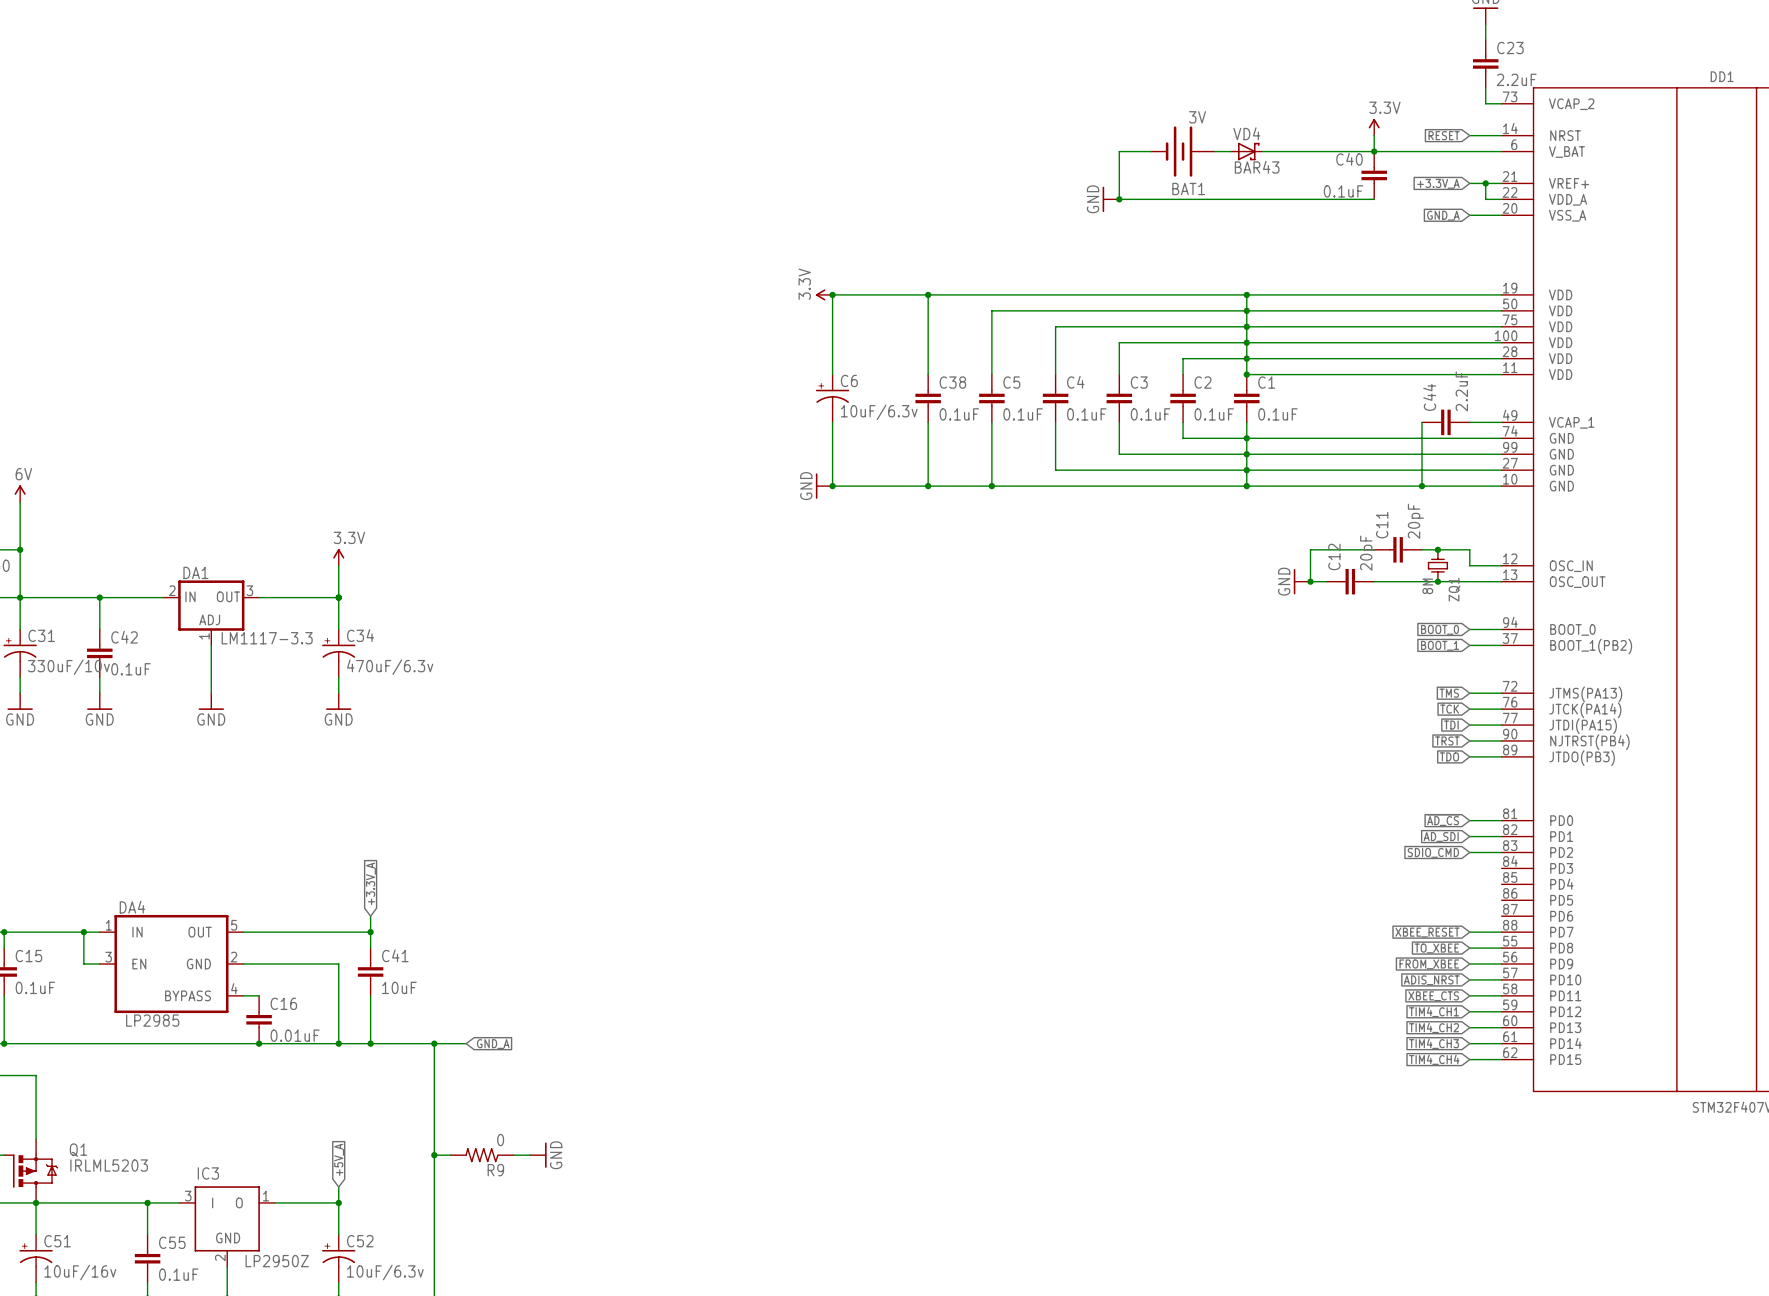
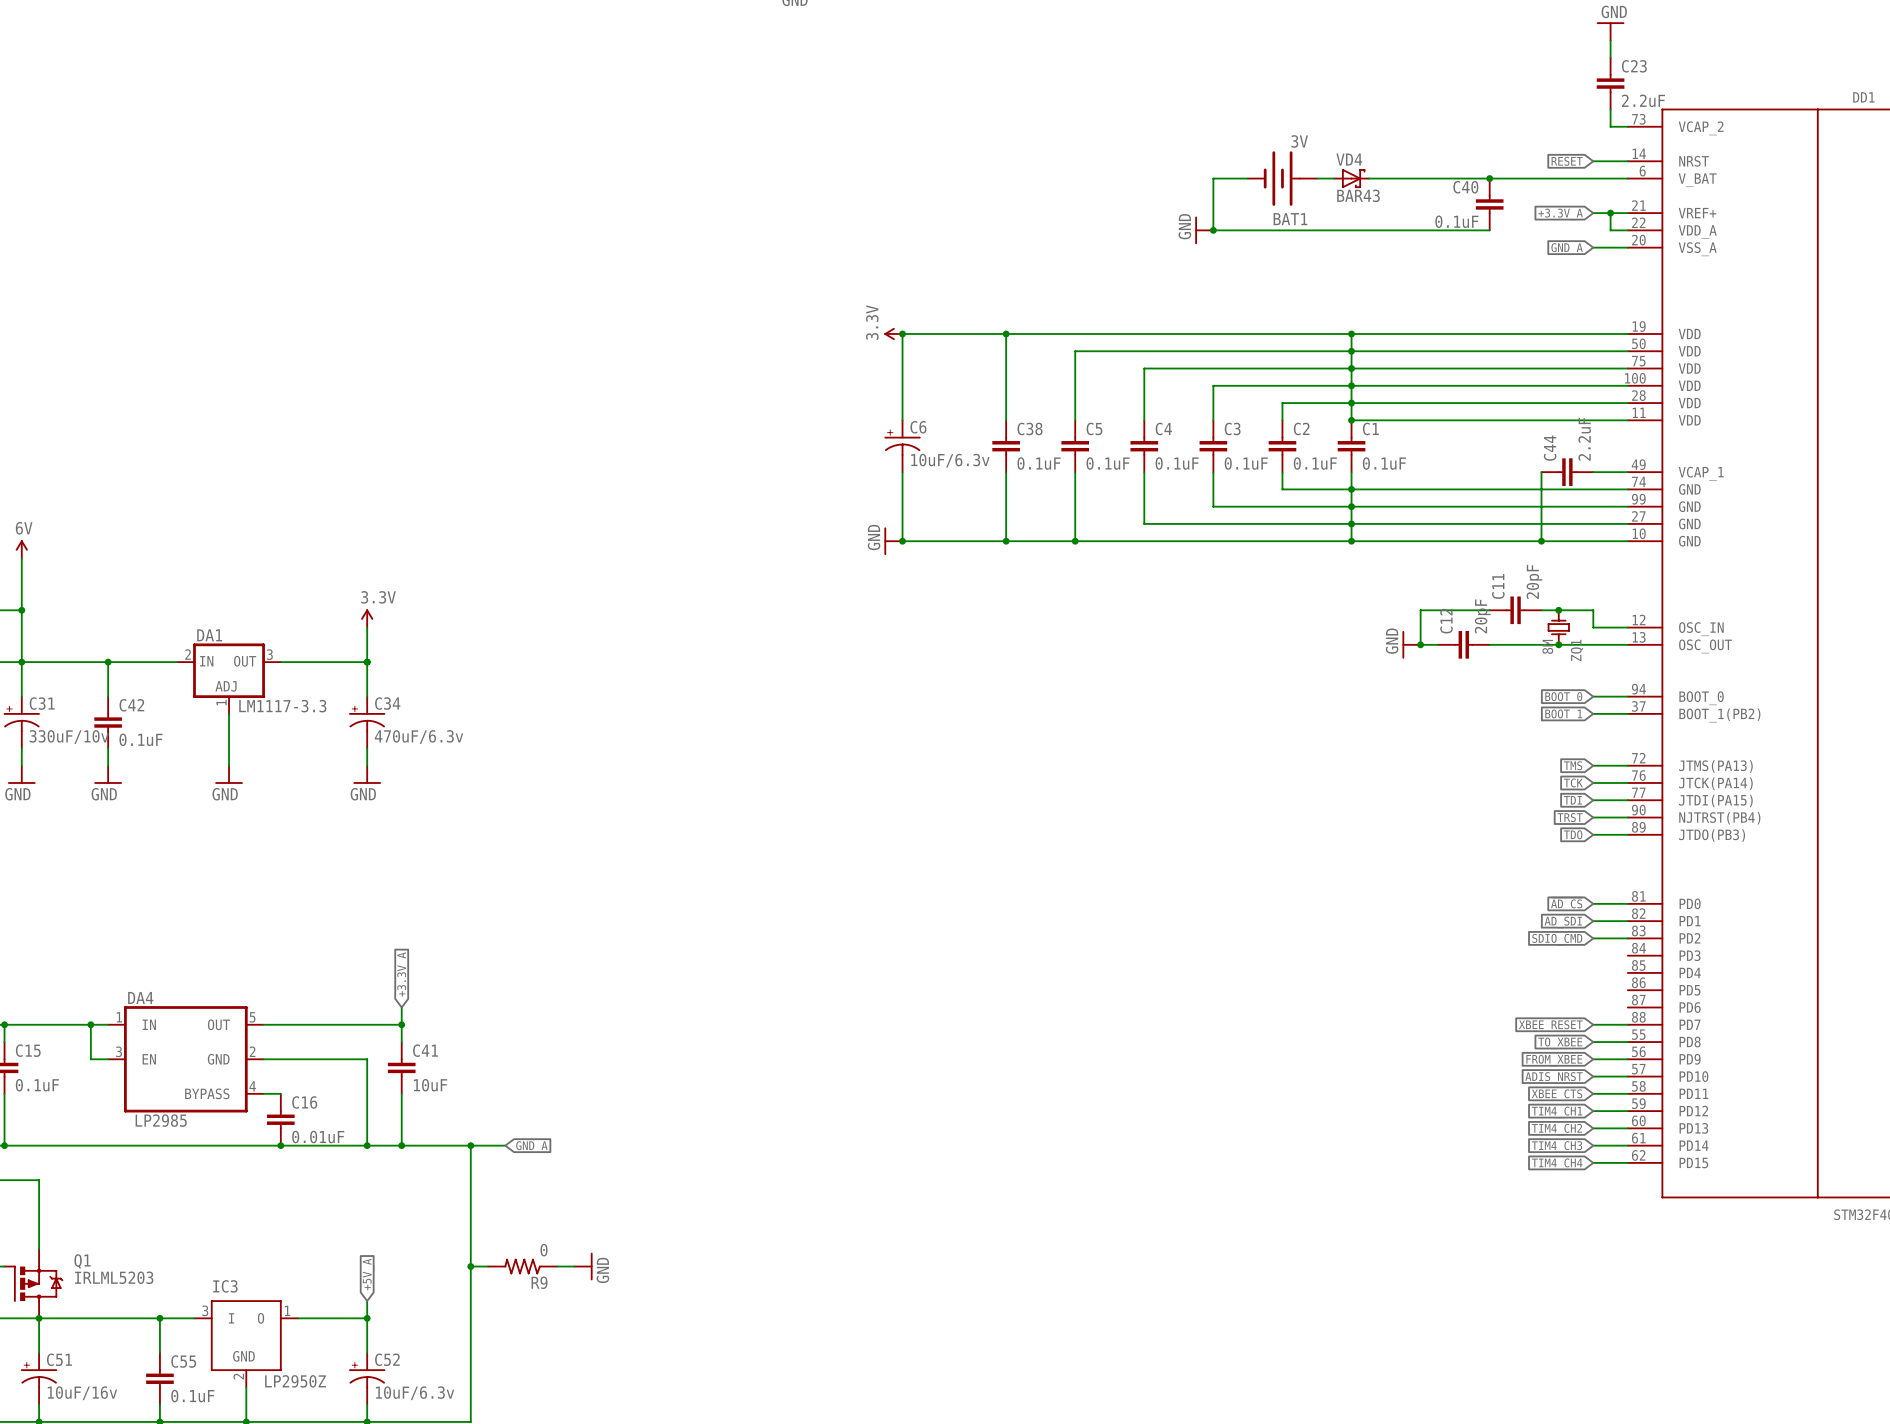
power symbol: 3.3V (1374, 127) -> none
wire: (1374, 135) (1374, 151) -> none

